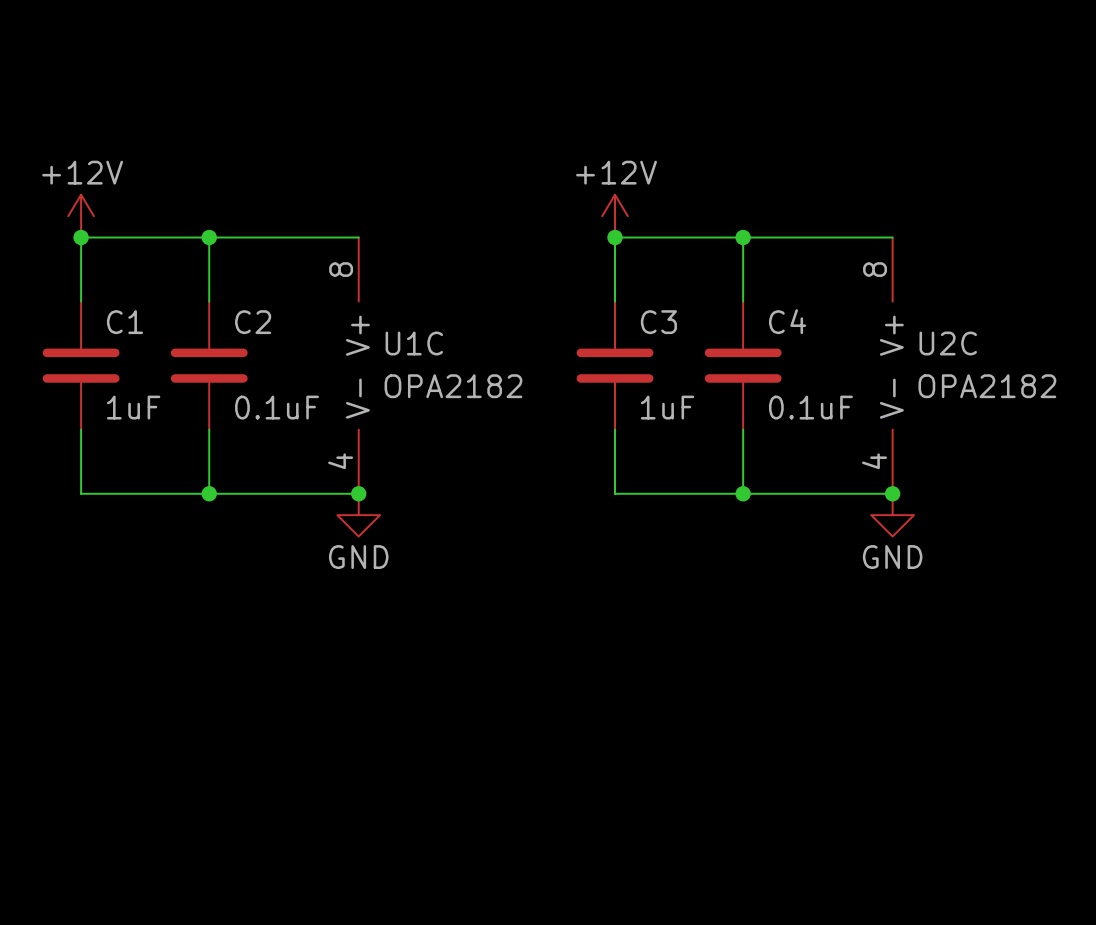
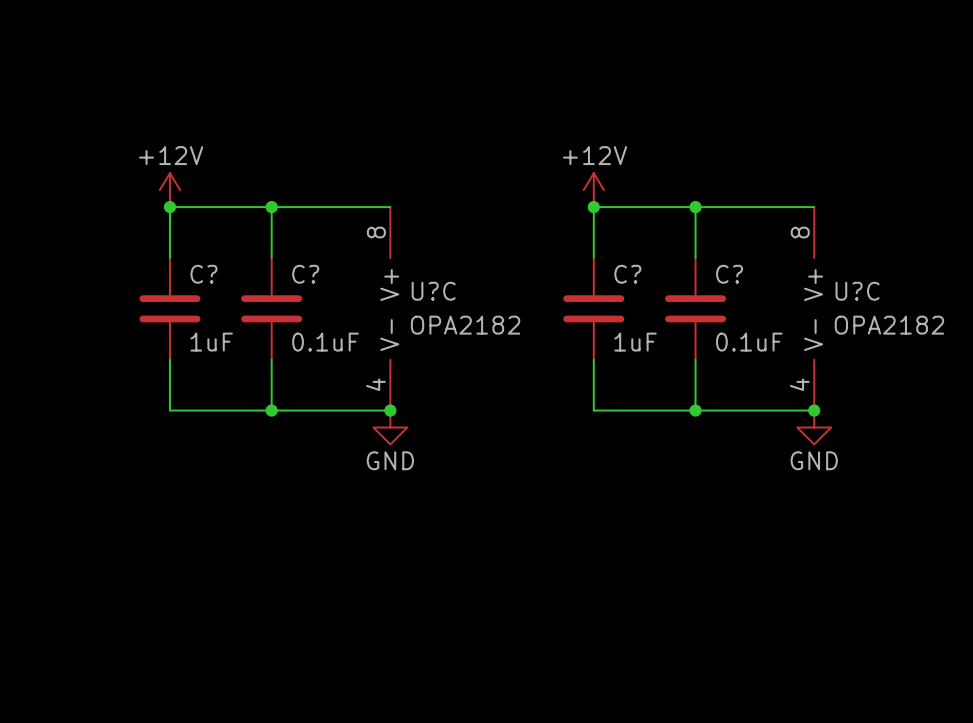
C4 name: C4 (787, 321) -> C? (729, 274)
C1 name: C1 (124, 322) -> C? (203, 274)
C2 name: C2 (253, 322) -> C? (305, 274)
C3 name: C3 (658, 322) -> C? (627, 274)
U1C name: U1C (414, 343) -> U?C (433, 291)
U2C name: U2C (948, 343) -> U?C (857, 291)

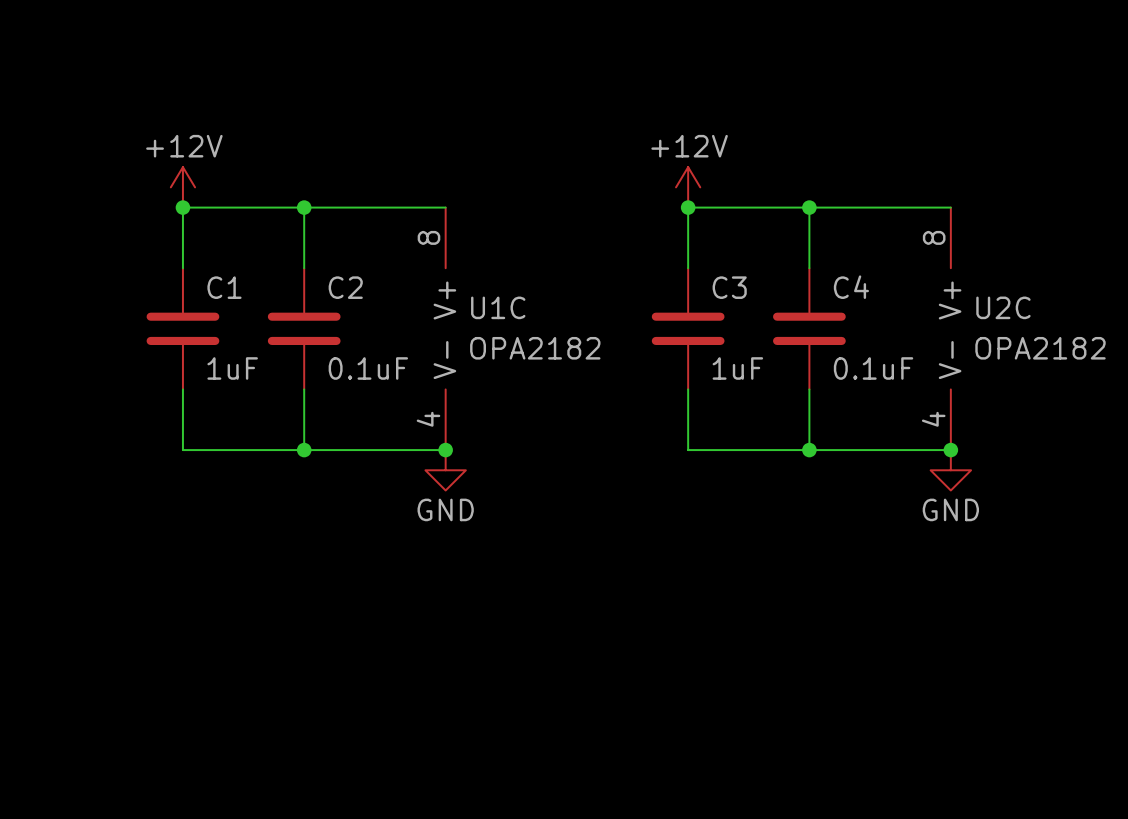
C? name: C? (203, 274) -> C1 (224, 287)
C? name: C? (305, 274) -> C2 (345, 287)
C? name: C? (627, 274) -> C3 (729, 287)
C? name: C? (729, 274) -> C4 (851, 287)
U?C name: U?C (433, 291) -> U1C (498, 307)
U?C name: U?C (857, 291) -> U2C (1003, 307)

